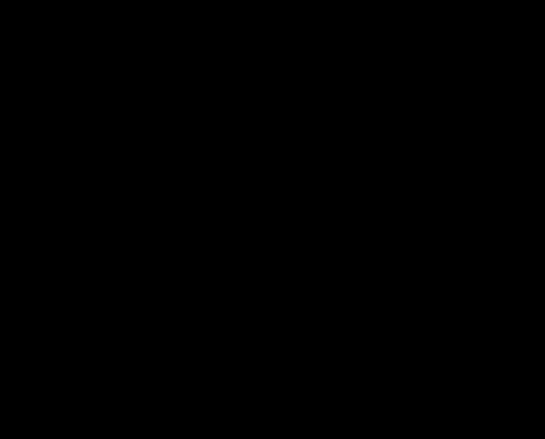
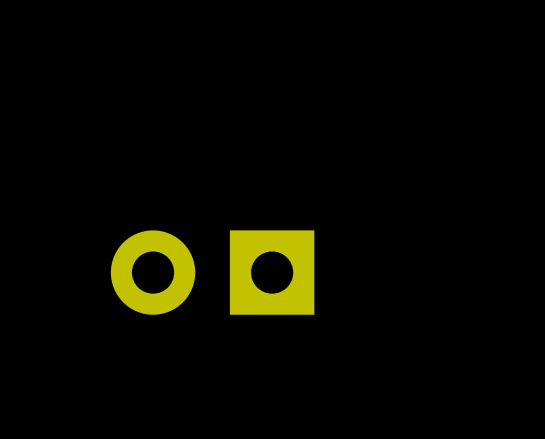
part: none -> (212, 272)

